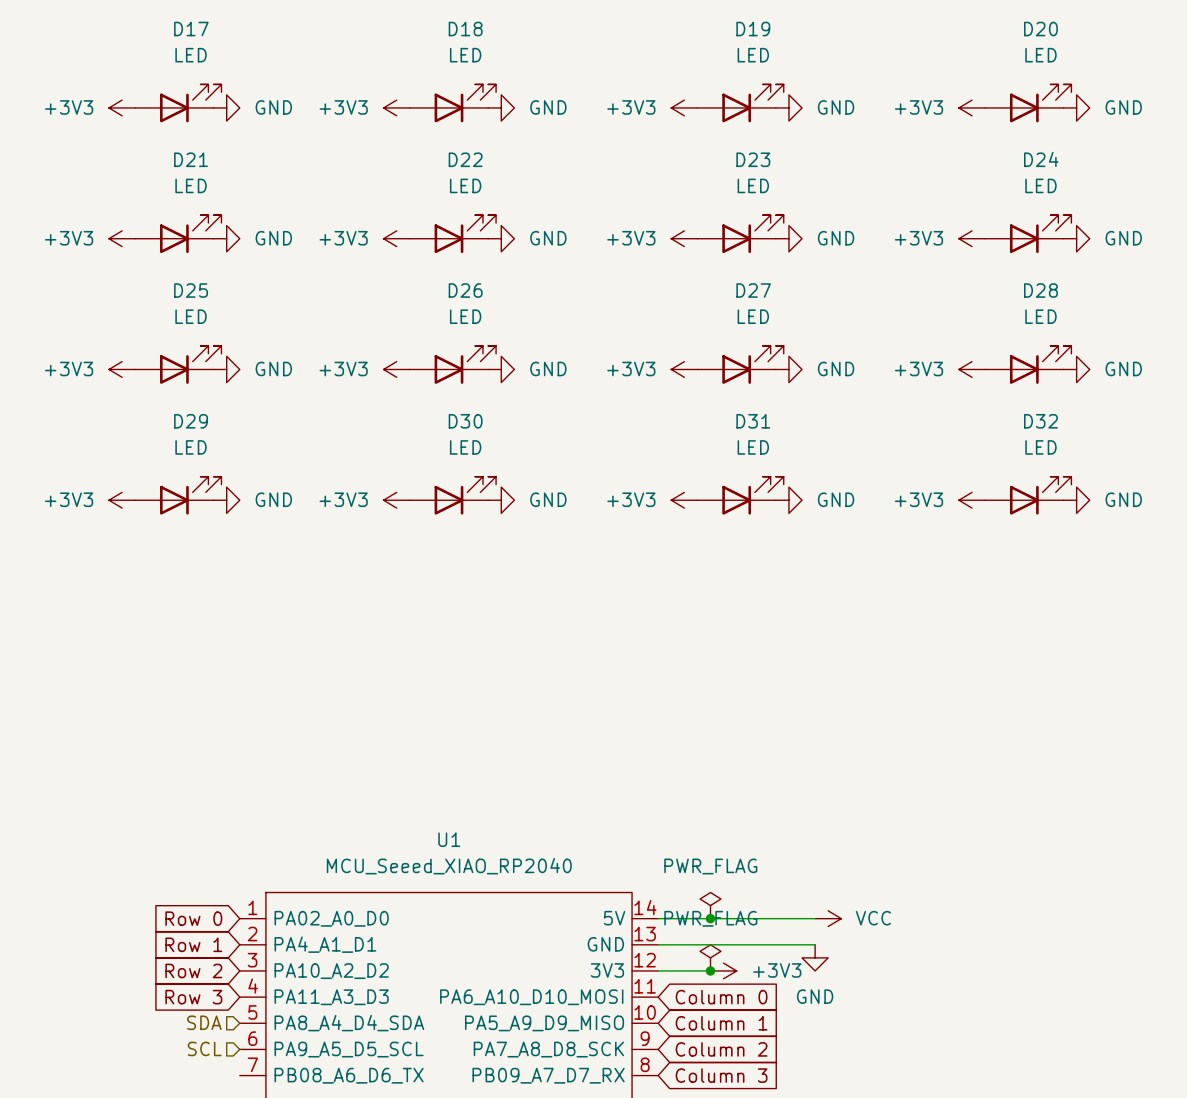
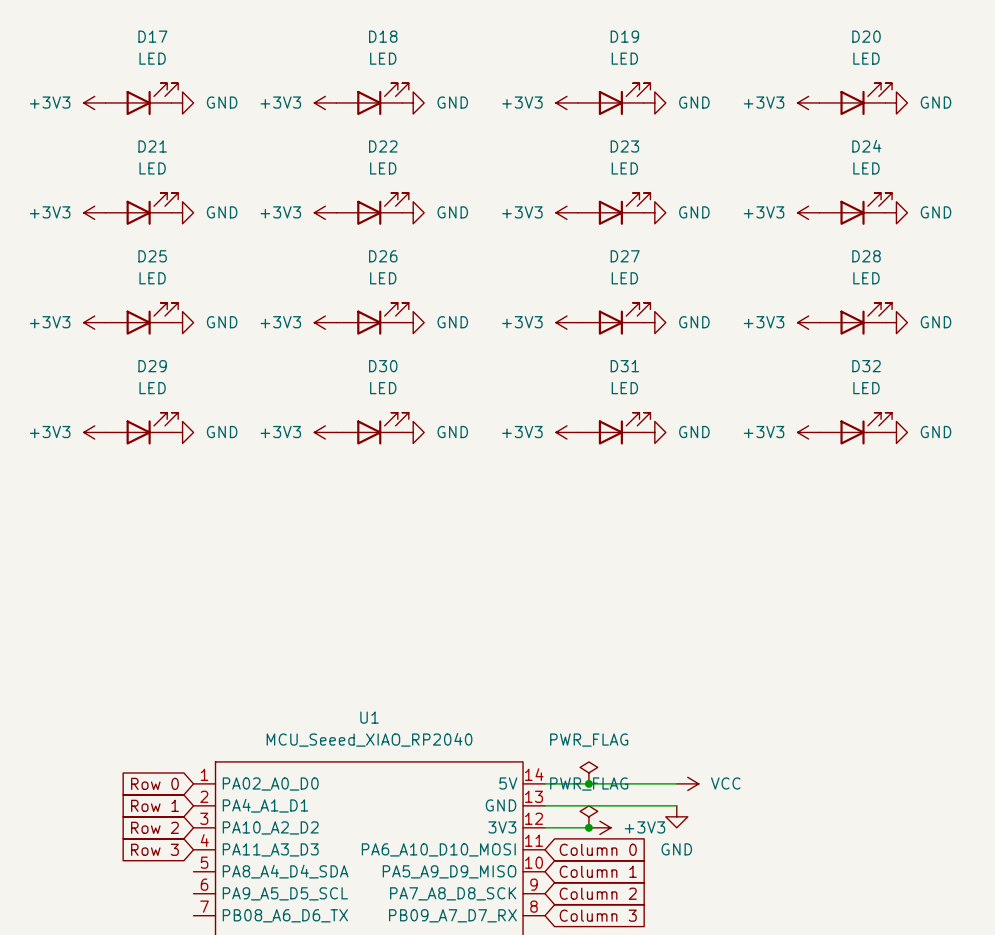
hierarchical label: SDA (204, 1022) -> none
hierarchical label: SCL (204, 1048) -> none

